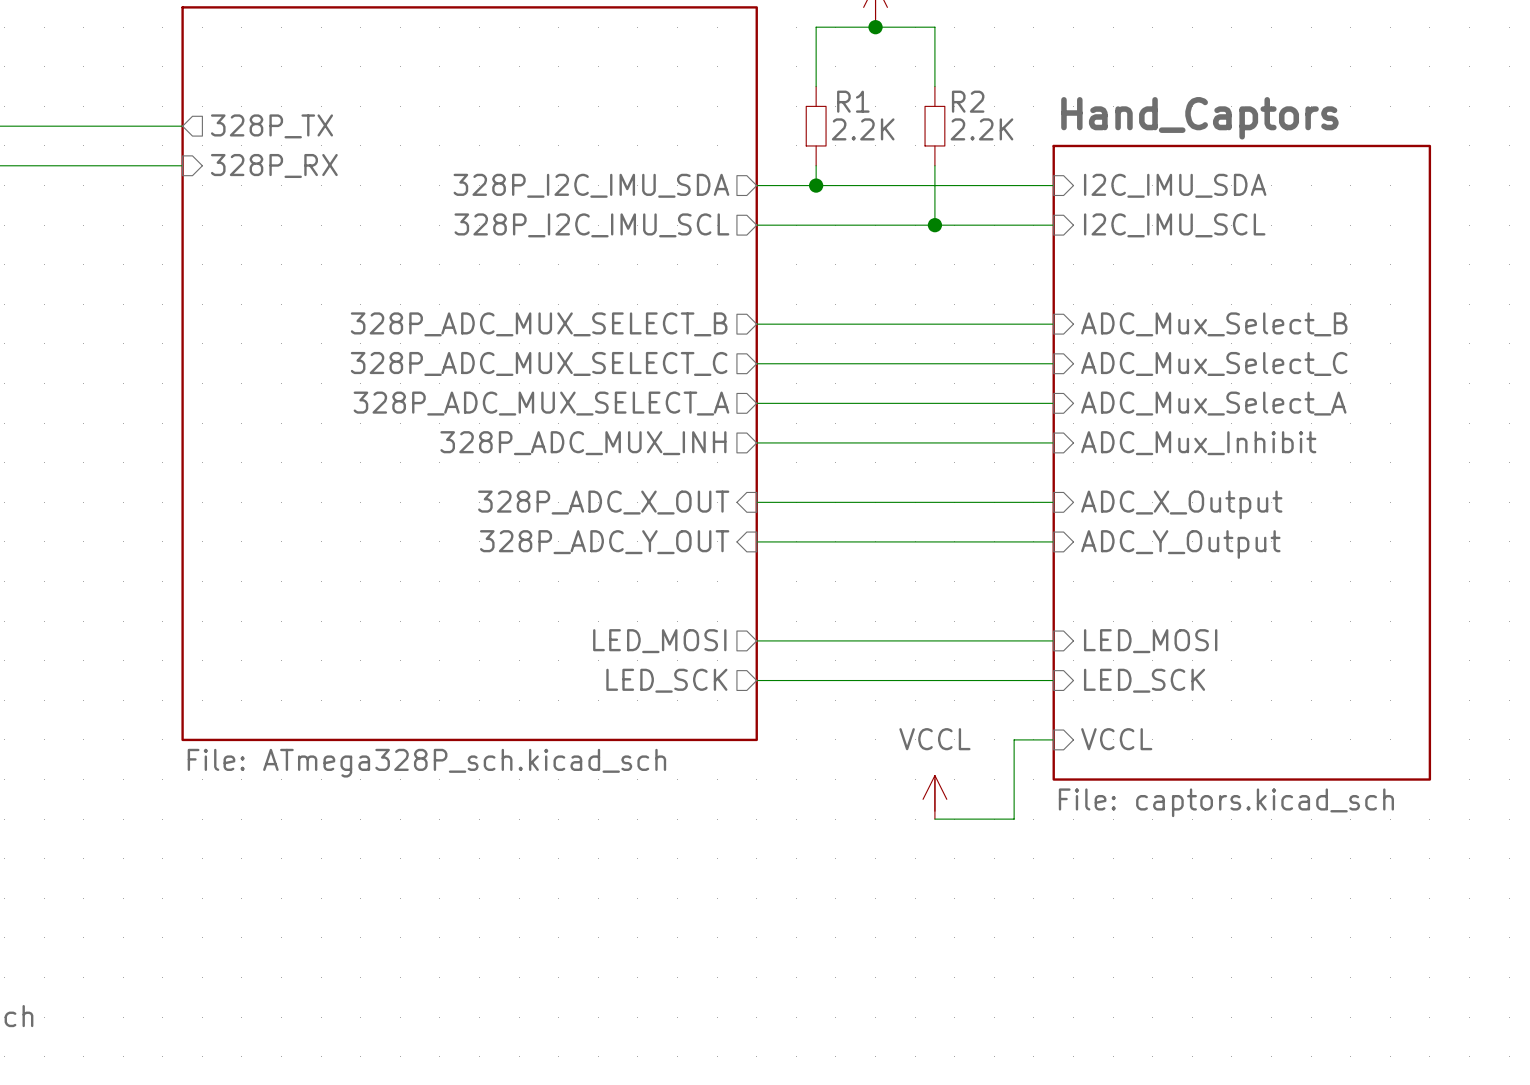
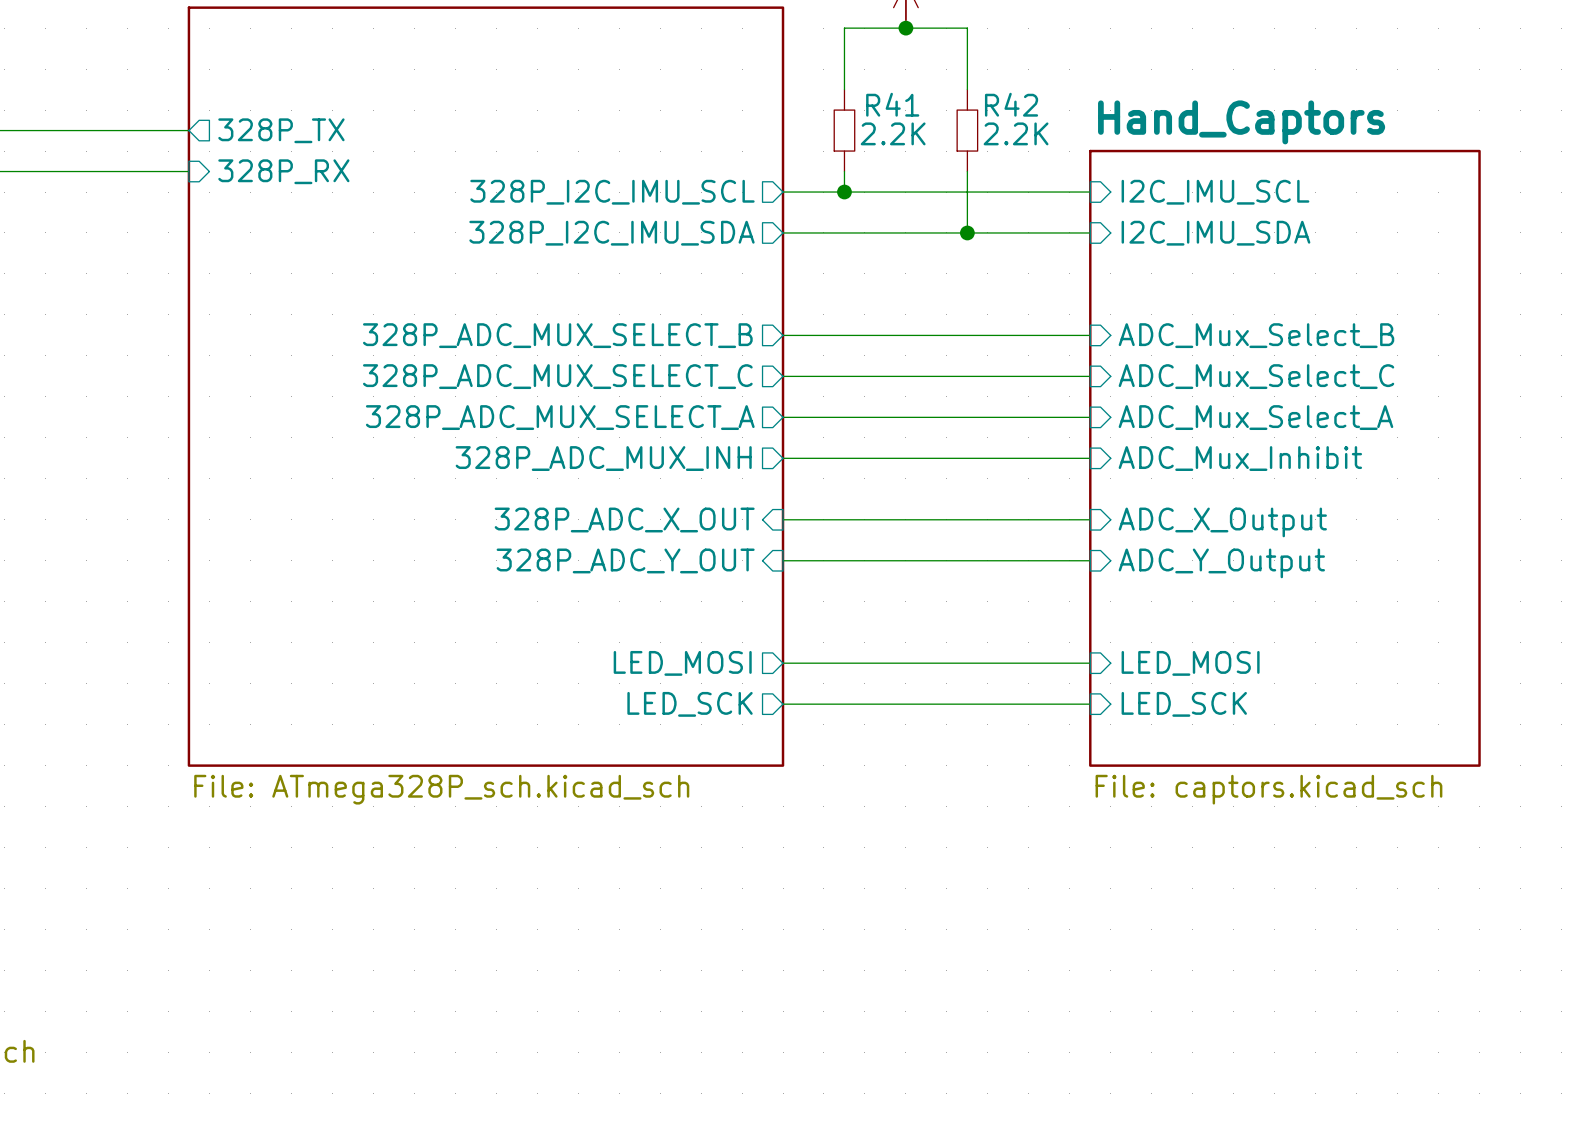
R1 name: R1 (853, 101) -> R41 (892, 104)
R2 name: R2 (968, 101) -> R42 (1011, 104)
sheet pin: 328P_I2C_IMU_SDA (591, 185) -> 328P_I2C_IMU_SCL (612, 192)
sheet pin: I2C_IMU_SDA (1175, 185) -> I2C_IMU_SCL (1215, 192)
sheet pin: 328P_I2C_IMU_SCL (591, 225) -> 328P_I2C_IMU_SDA (611, 233)
sheet pin: I2C_IMU_SCL (1174, 225) -> I2C_IMU_SDA (1215, 233)
sheet Hand_Captors: none -> File: captors.kicad_sch (1284, 458)
sheet Hand_Captors: File: captors.kicad_sch (1241, 462) -> none
wire: (1053, 739) (1014, 739) (1014, 819) (934, 819) -> none
sheet pin: VCCL (1116, 739) -> none
power symbol: VCCL (934, 797) -> none

